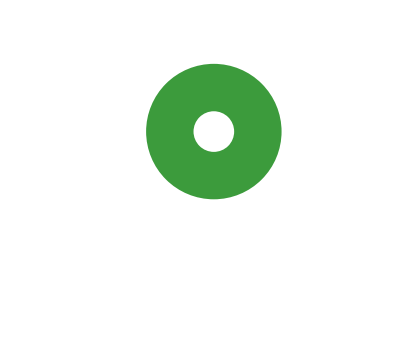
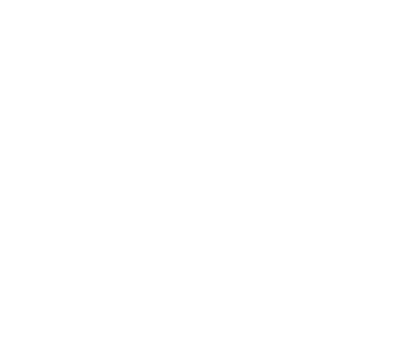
part: (213, 131) -> none

